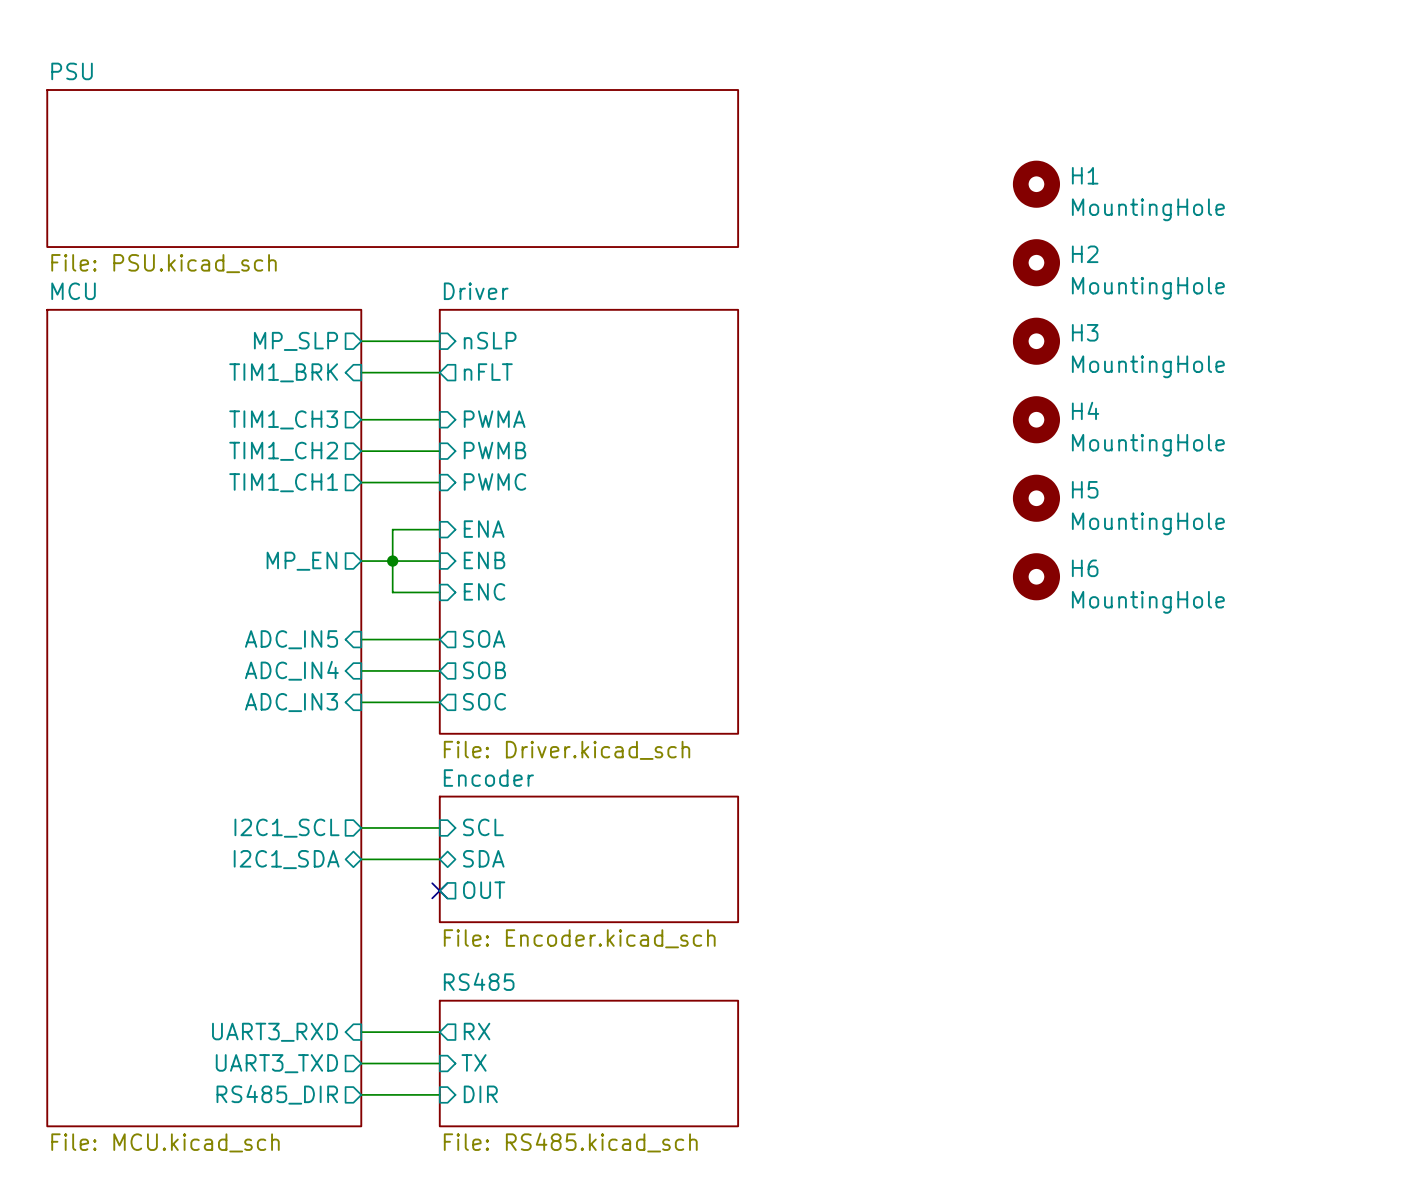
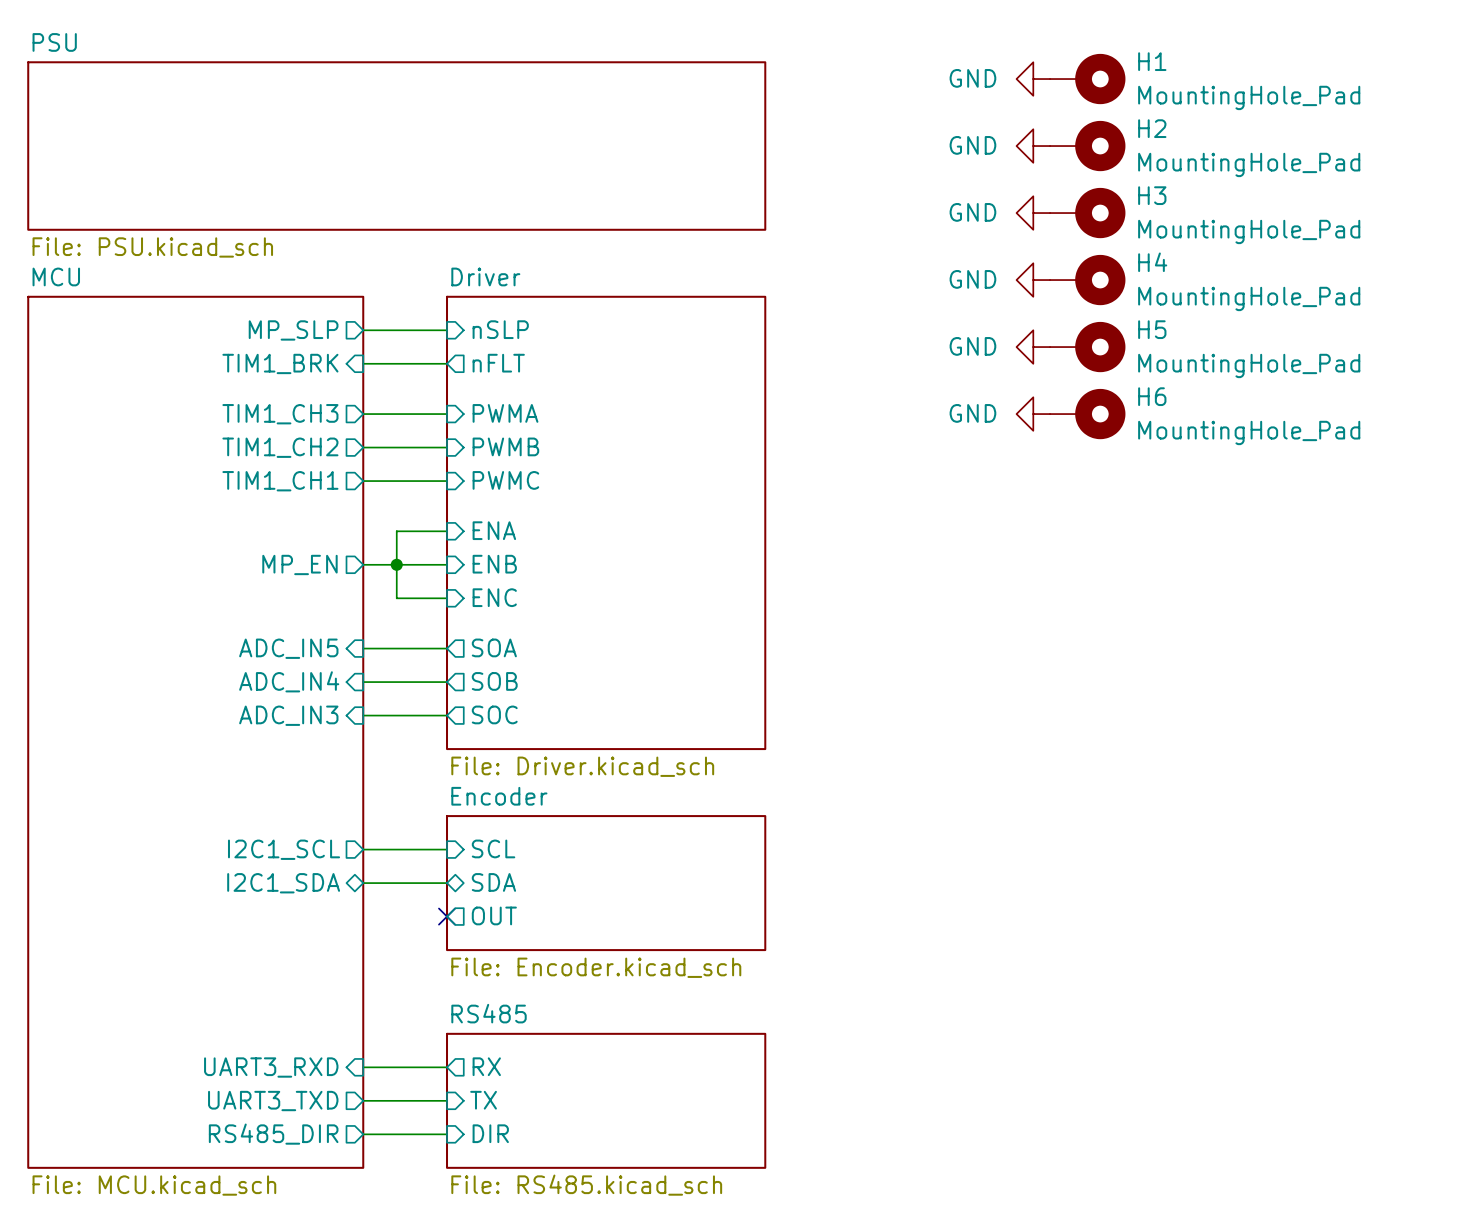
power symbol: none -> GND (1033, 79)
H1 symbol: [1012, 160, 1061, 208] -> [1050, 53, 1126, 105]
power symbol: none -> GND (1033, 146)
H1 value: MountingHole (1148, 209) -> MountingHole_Pad (1249, 97)
power symbol: none -> GND (1033, 213)
H2 symbol: [1012, 239, 1061, 287] -> [1050, 120, 1126, 172]
H2 value: MountingHole (1148, 288) -> MountingHole_Pad (1249, 164)
power symbol: none -> GND (1033, 280)
H3 symbol: [1012, 317, 1061, 365] -> [1050, 187, 1126, 239]
power symbol: none -> GND (1033, 347)
H3 value: MountingHole (1148, 366) -> MountingHole_Pad (1249, 231)
H4 symbol: [1012, 396, 1061, 444] -> [1050, 254, 1126, 306]
power symbol: none -> GND (1033, 414)
H4 value: MountingHole (1148, 445) -> MountingHole_Pad (1249, 298)
H5 symbol: [1012, 474, 1061, 522] -> [1050, 321, 1126, 373]
H5 value: MountingHole (1148, 523) -> MountingHole_Pad (1249, 365)
H6 symbol: [1012, 553, 1061, 601] -> [1050, 388, 1126, 440]
H6 value: MountingHole (1148, 602) -> MountingHole_Pad (1249, 432)

